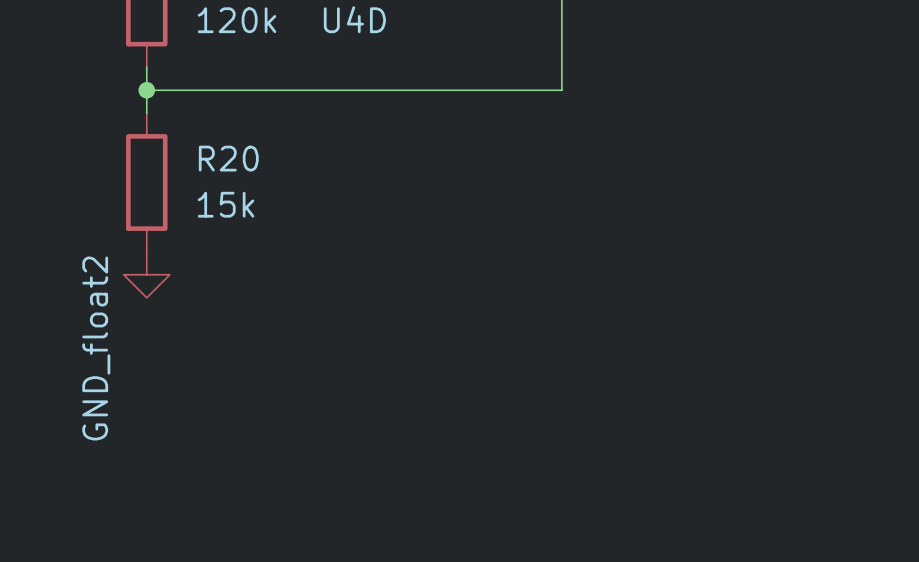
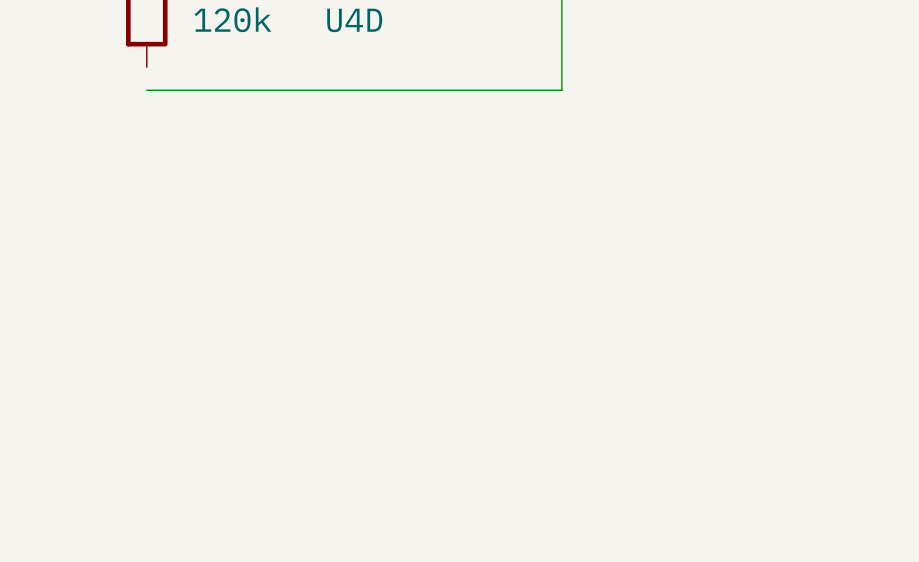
wire: (146, 67) (146, 113) -> none
junction: (146, 90) -> none
R20: 15k (146, 182) -> none
power symbol: GND_float2 (146, 274) -> none

